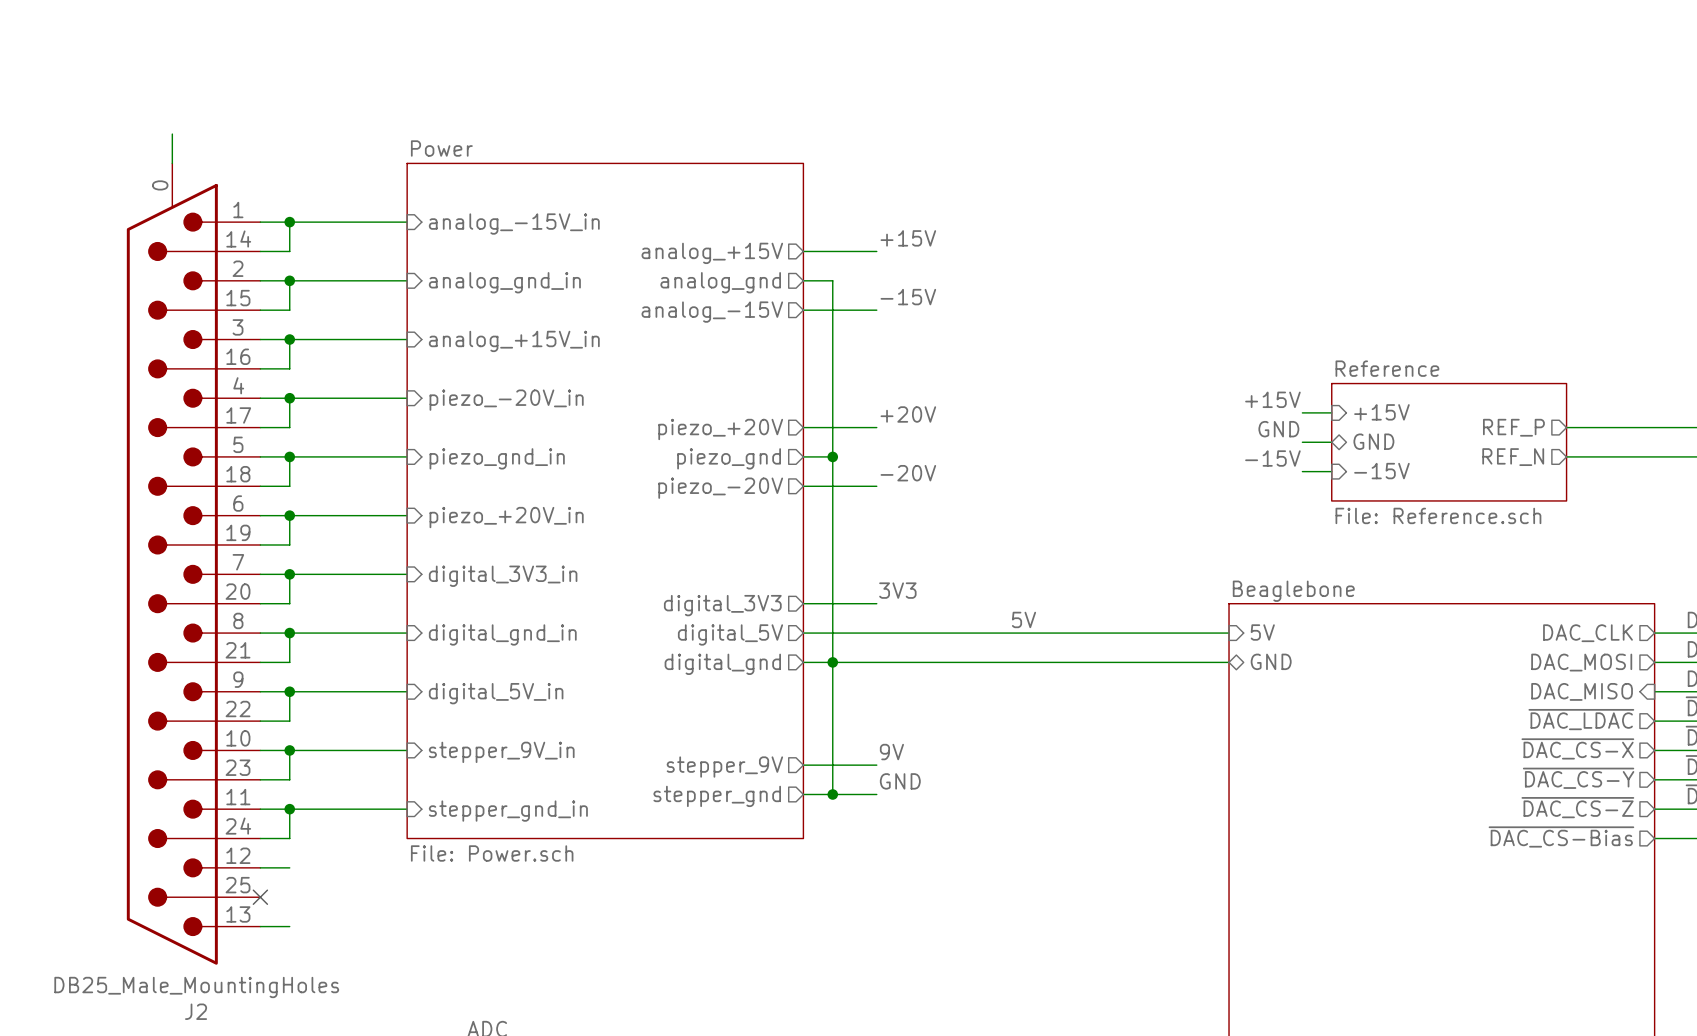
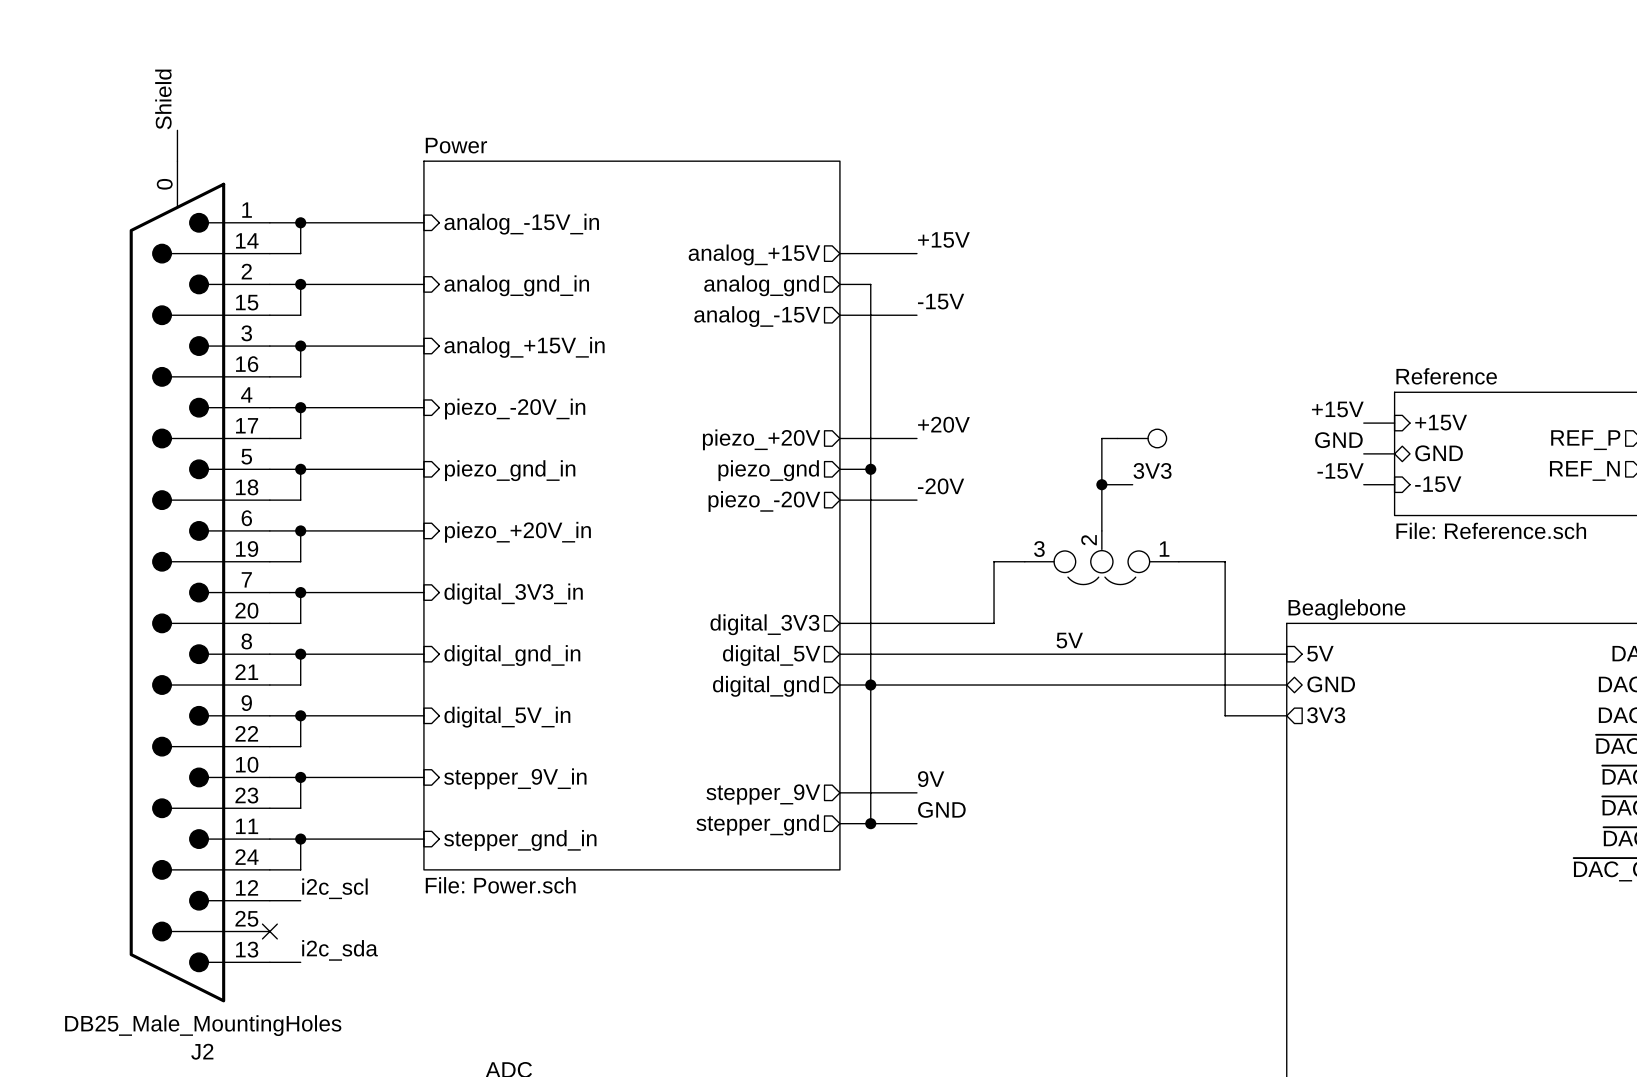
label: none -> Shield (163, 99)
wire: none -> (1117, 438) (1101, 438) (1101, 530)
part: none -> (1141, 438)
wire: none -> (1101, 484) (1132, 484)
junction: none -> (1101, 484)
part: none -> (1101, 557)
wire: none -> (1024, 561) (994, 561) (994, 623) (916, 623)
wire: none -> (1178, 561) (1225, 561) (1225, 715) (1286, 715)
label position: 3V3 (897, 590) -> 3V3 (1152, 470)
sheet pin: none -> 3V3 (1326, 715)
label: none -> i2c_scl (334, 888)
label: none -> i2c_sda (340, 950)

